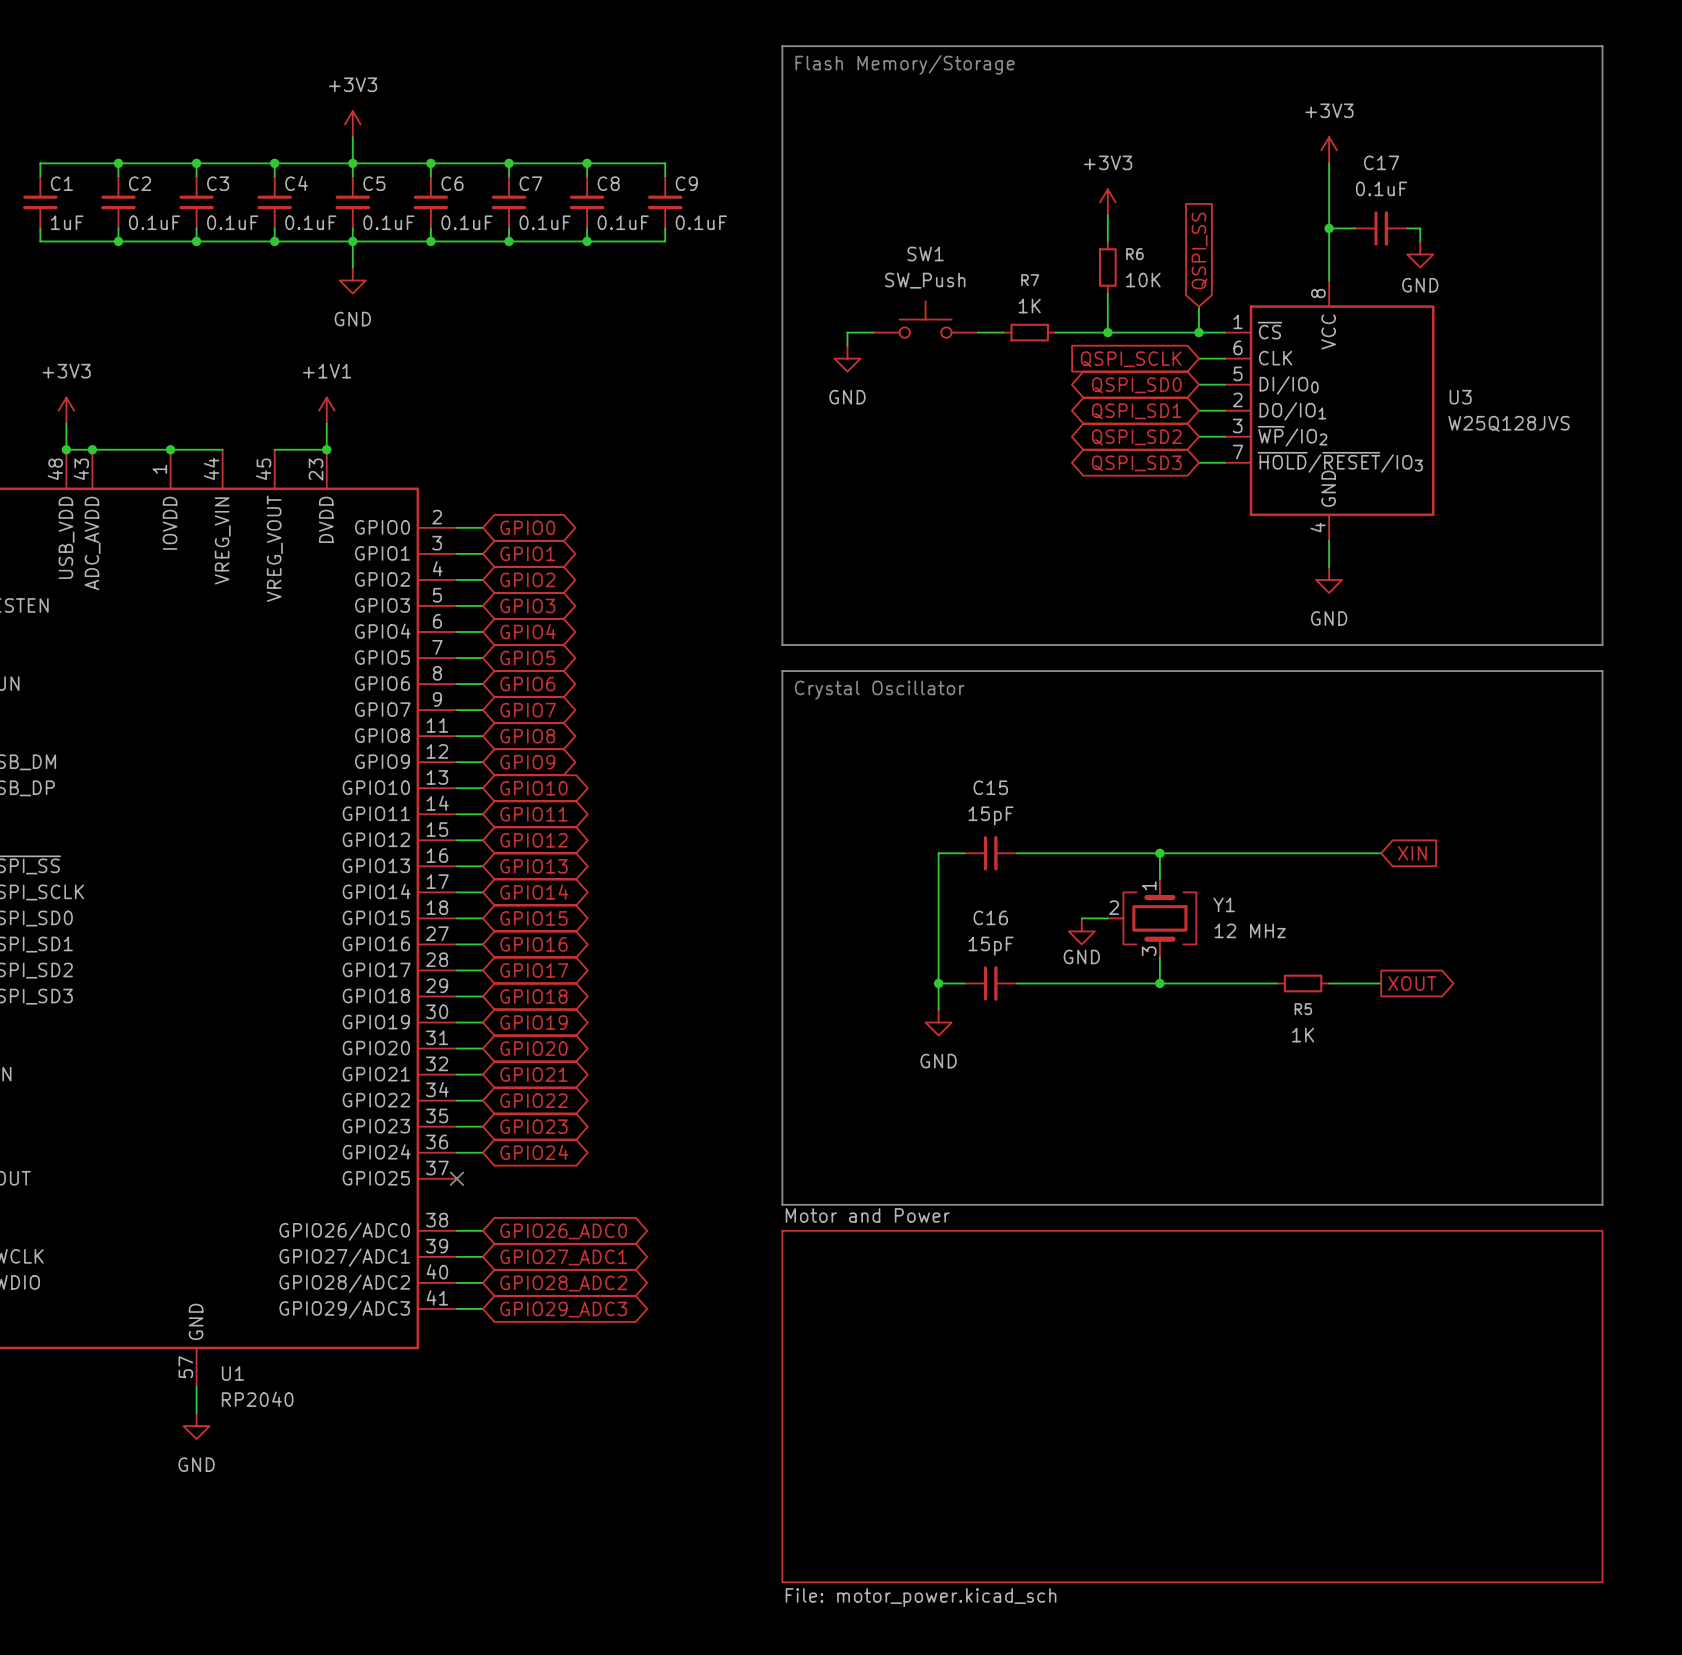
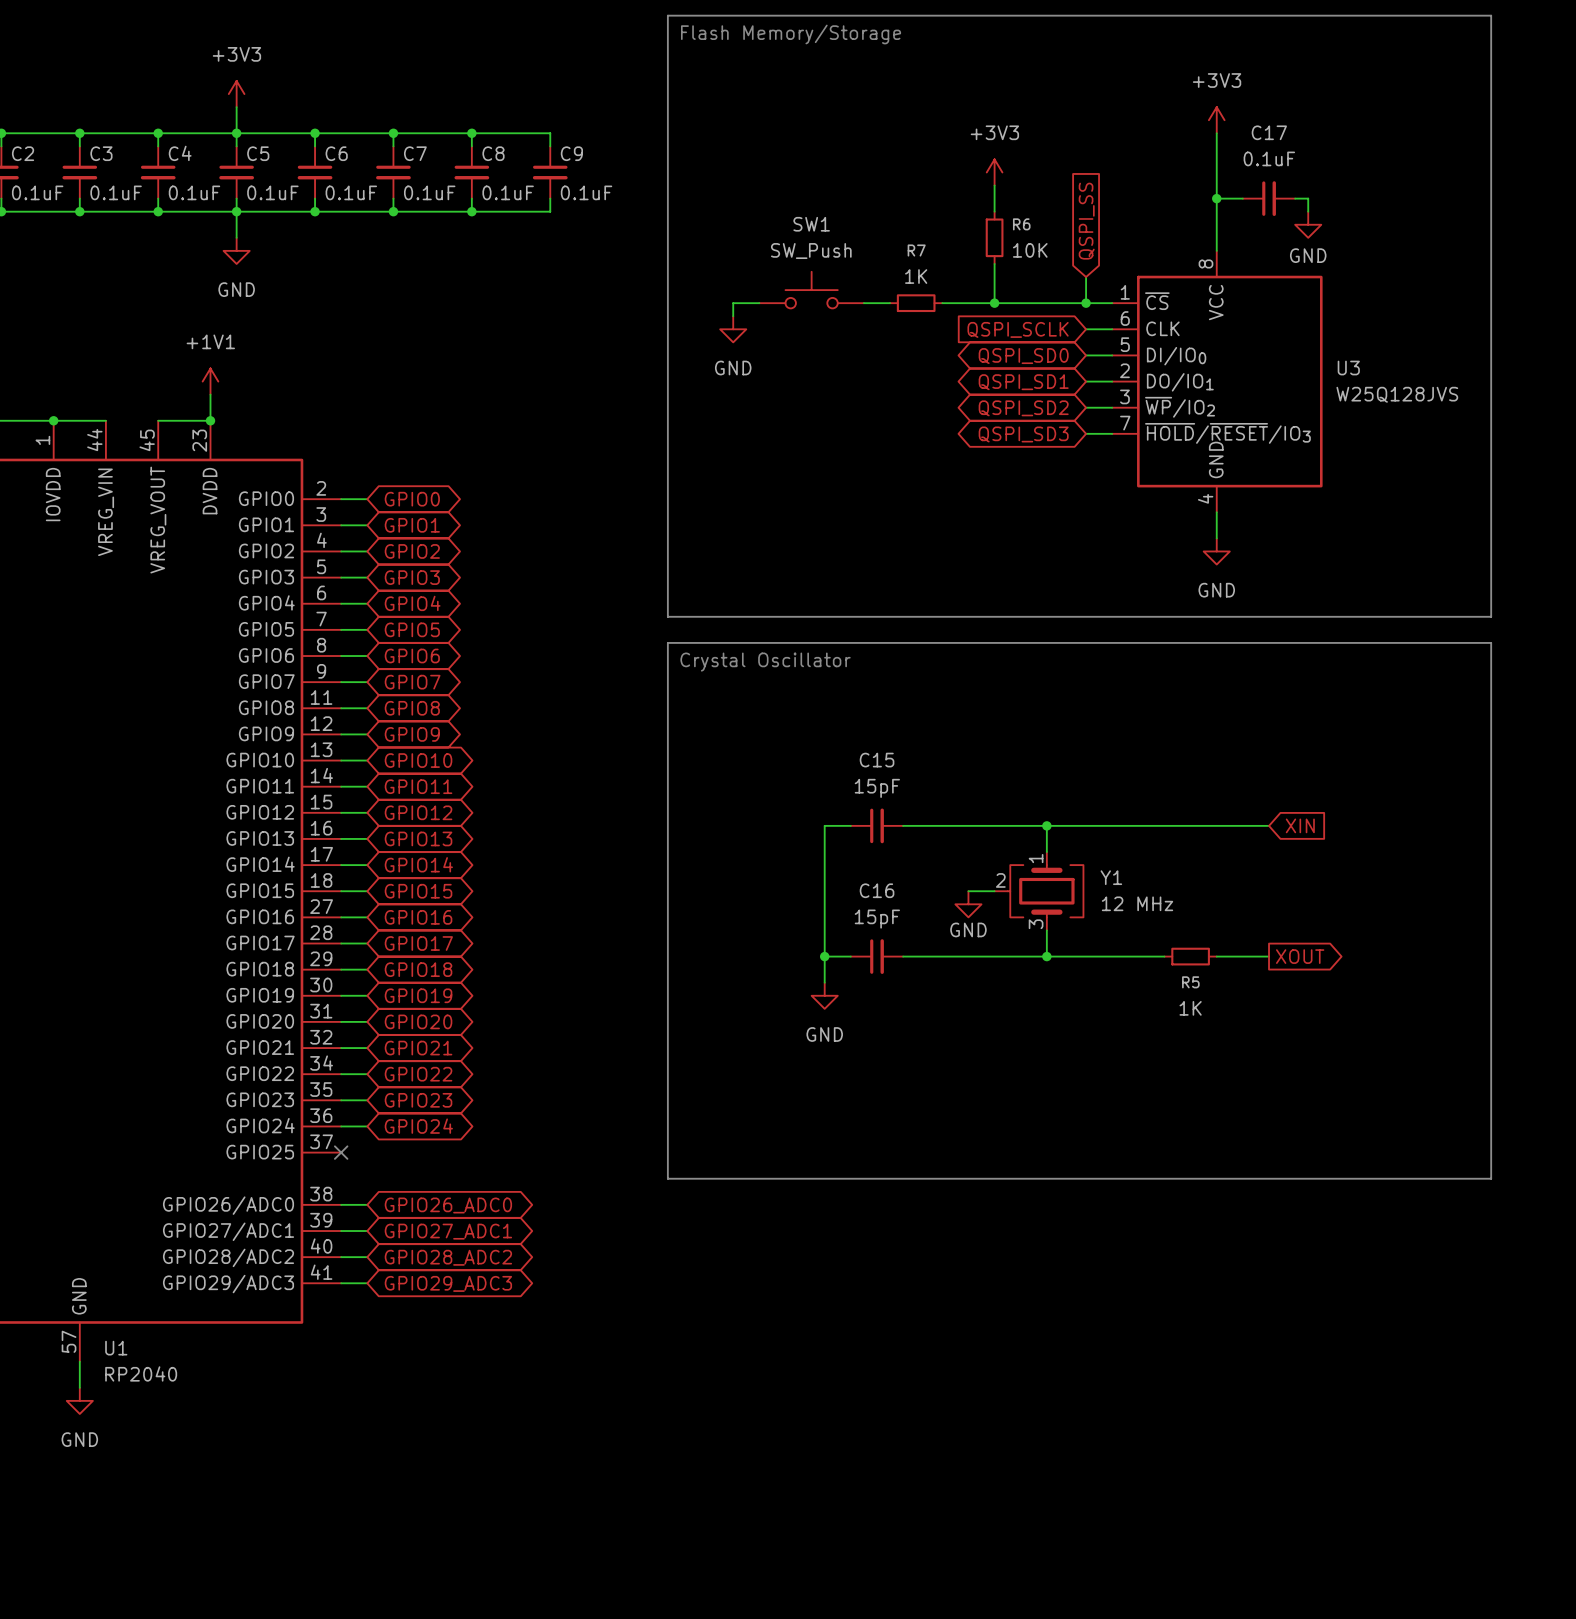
sheet Motor and Power: File: motor_power.kicad_sch (1192, 1406) -> none

